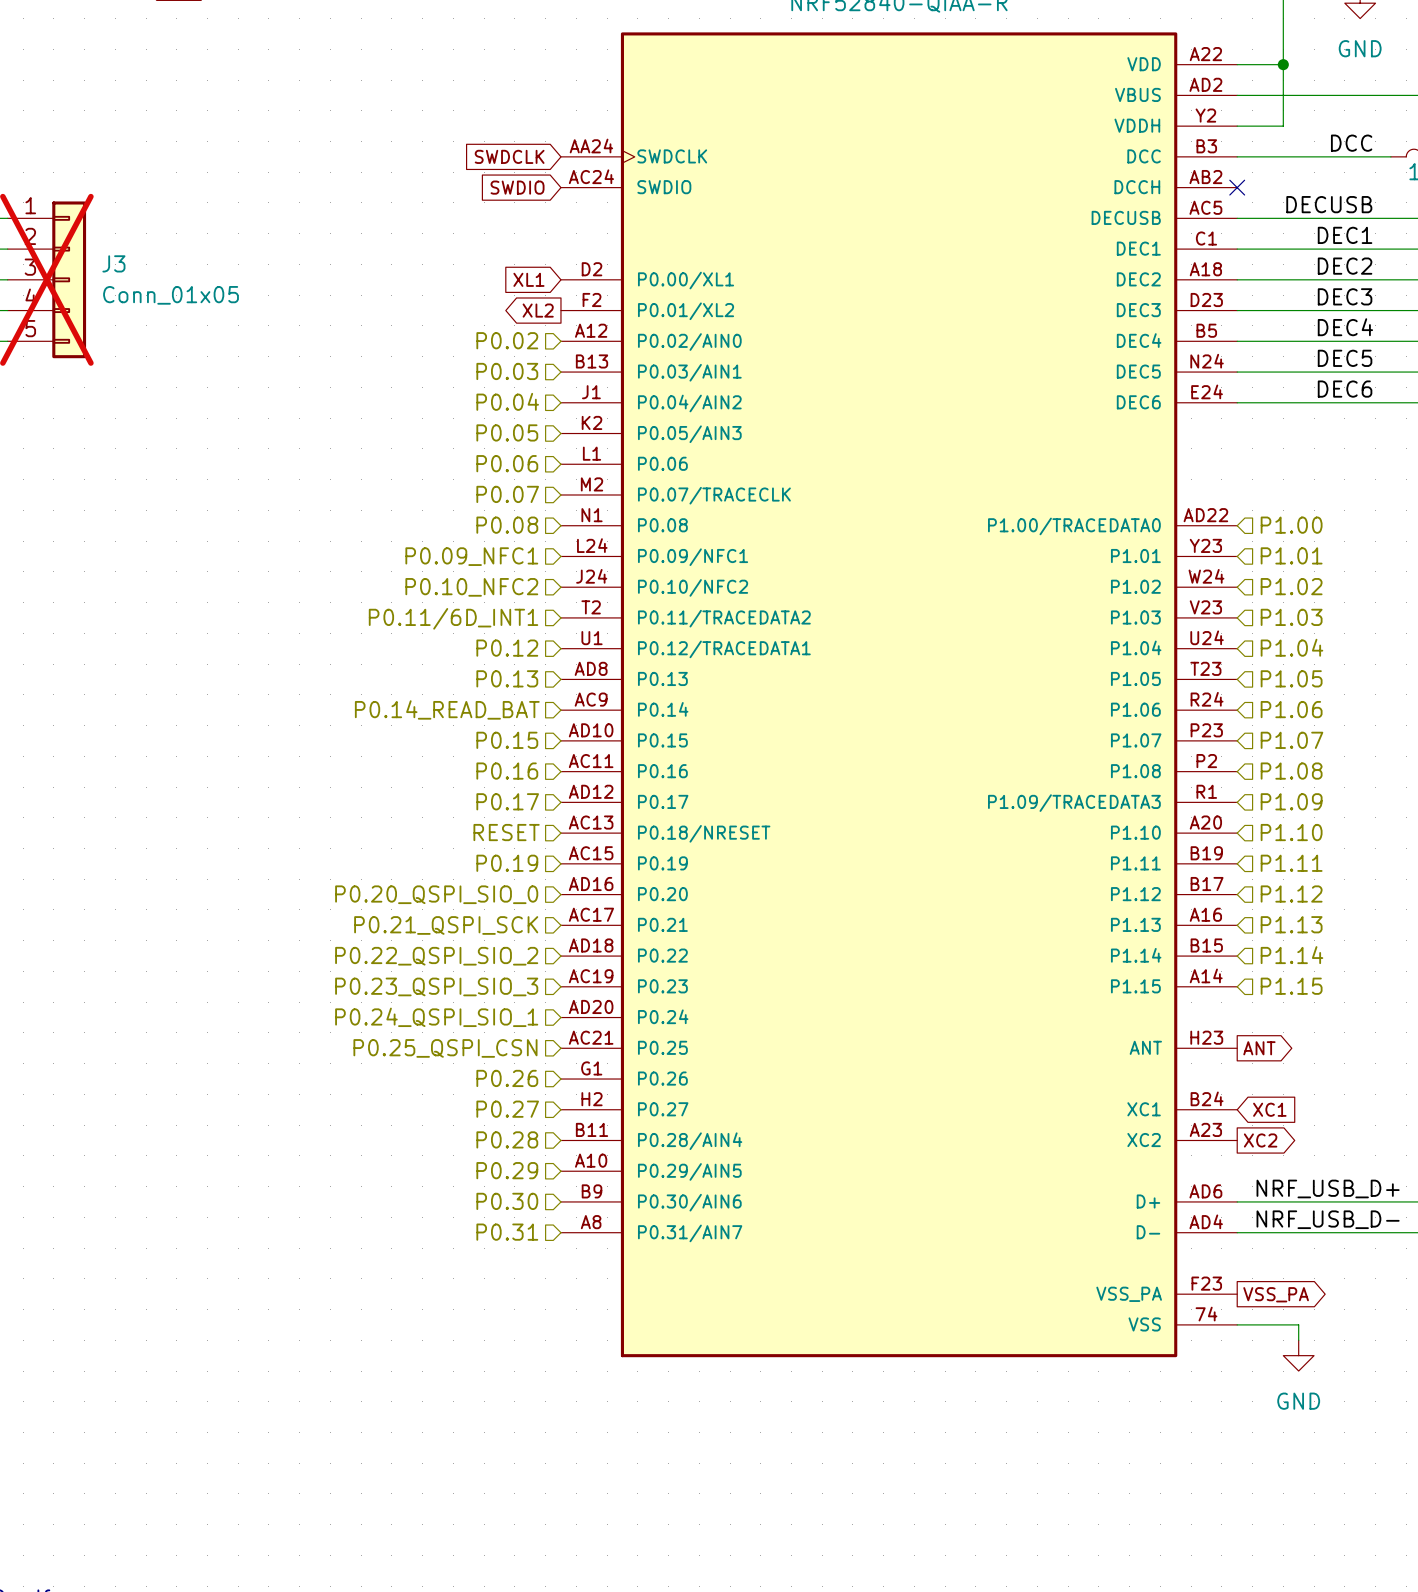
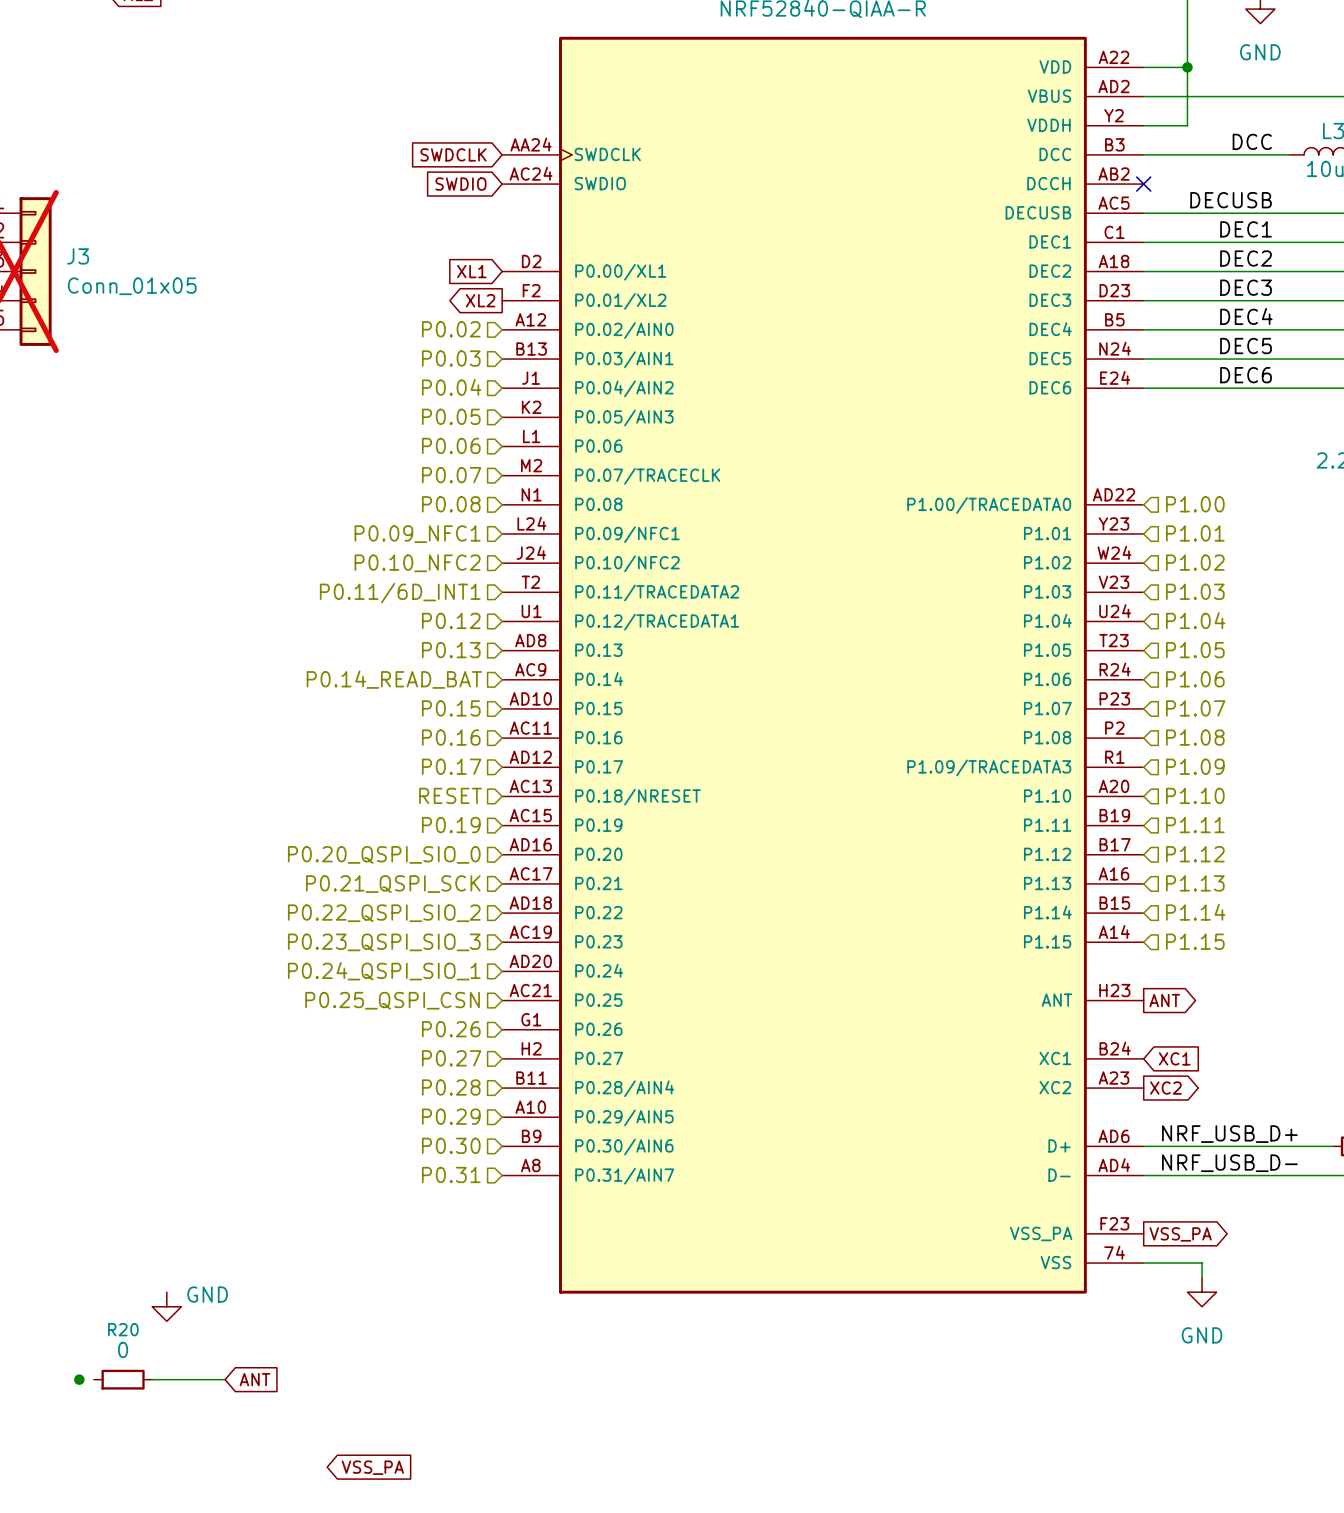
power symbol: none -> GND (166, 1306)
junction: none -> (79, 1379)
R20: none -> 0 (123, 1379)
wire: none -> (152, 1379) (225, 1379)
global label: none -> ANT (254, 1379)
global label: none -> VSS_PA (372, 1467)

